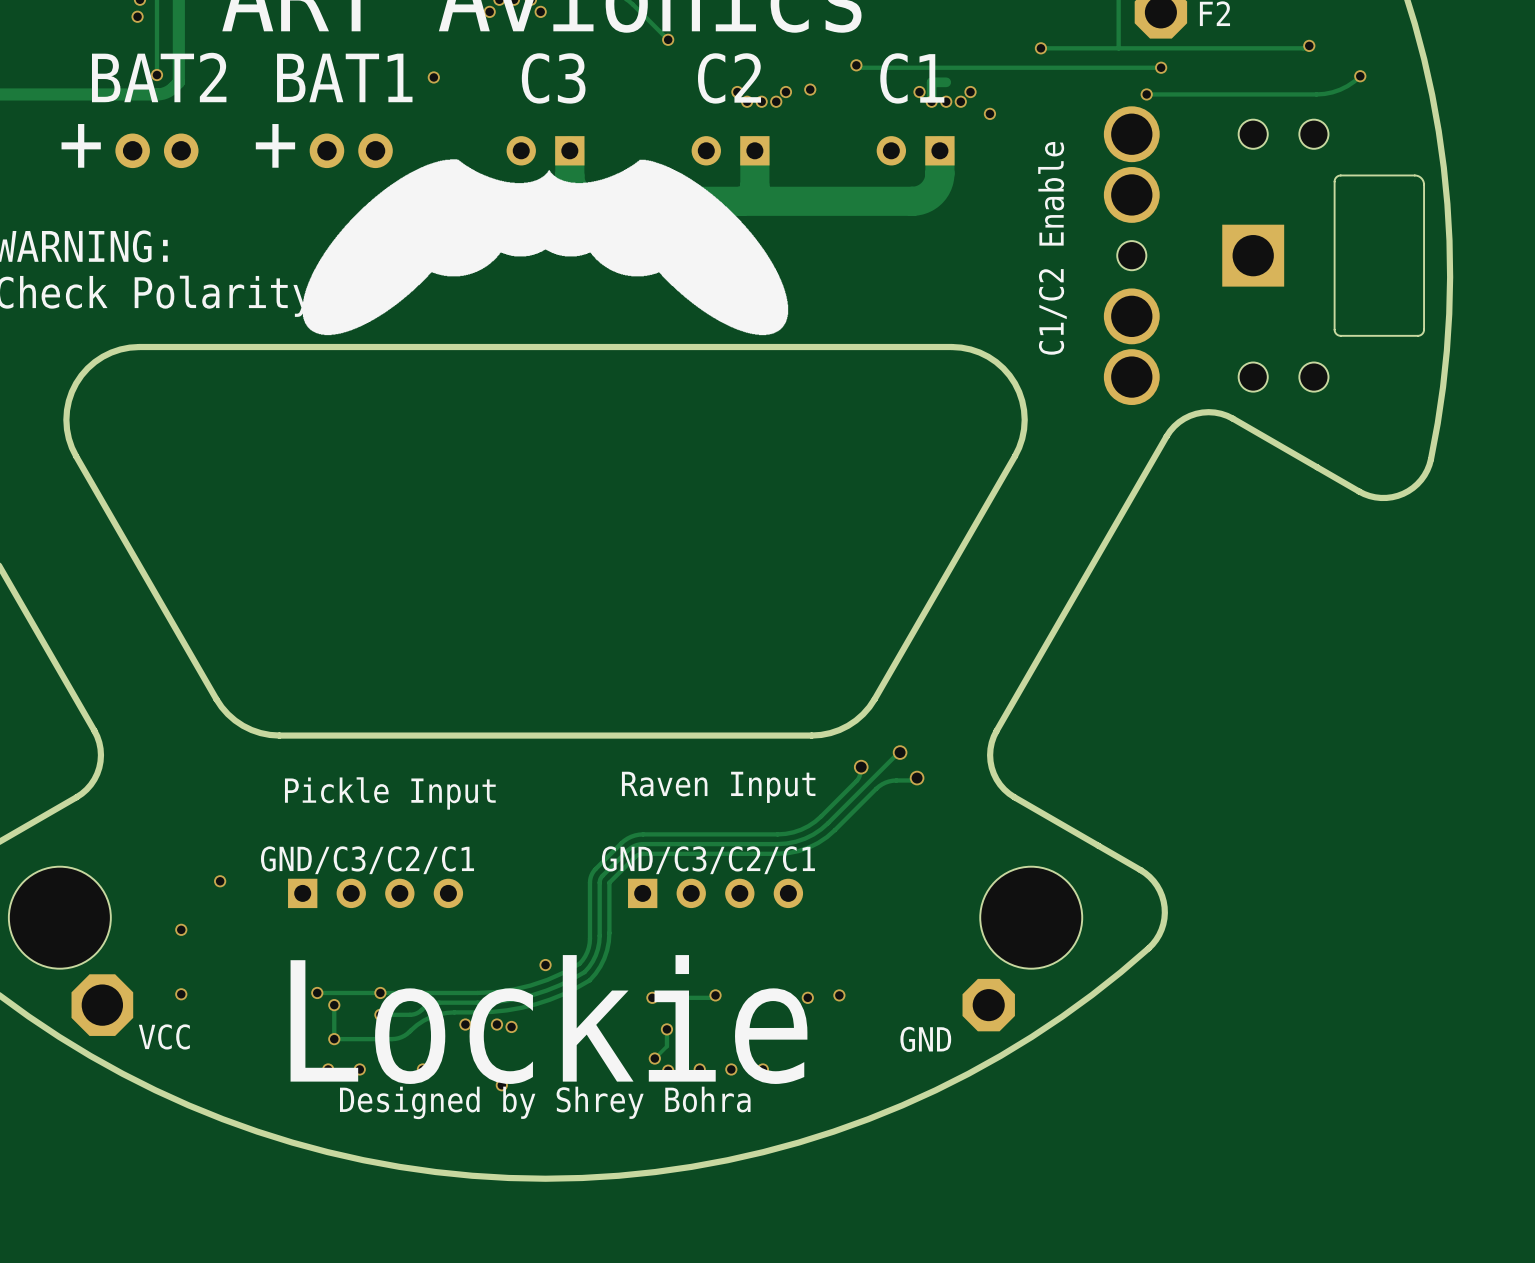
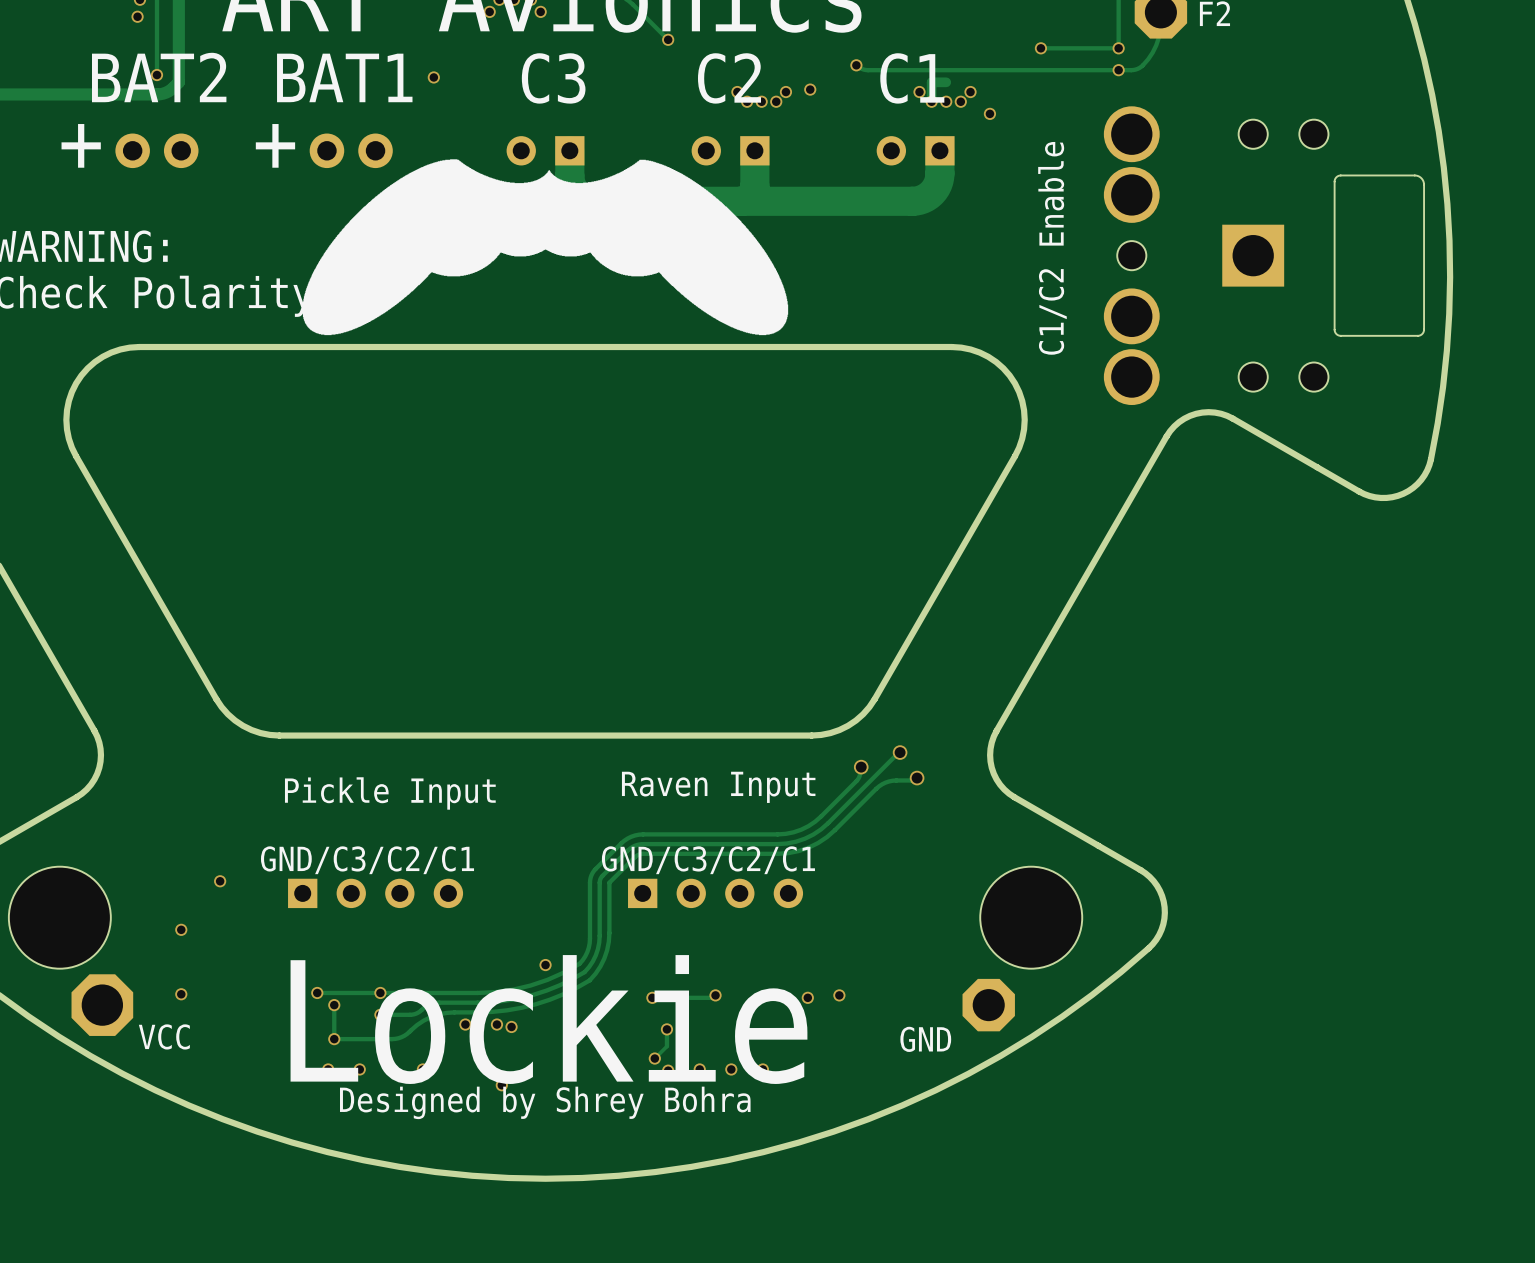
track: (1309, 45) (1303, 48) (1118, 48) -> none
via: (1309, 45) -> none
via: none -> (1118, 48)
track: (856, 65) (858, 67) (1161, 67) -> (856, 65) (868, 70) (1133, 70) (1142, 65) (1156, 45) (1160, 29) (1160, 12)
via: (1161, 67) -> none
via: none -> (1118, 70)
track: (1360, 76) (1340, 89) (1324, 93) (1146, 94) -> none
via: (1360, 76) -> none
via: (1146, 94) -> none

